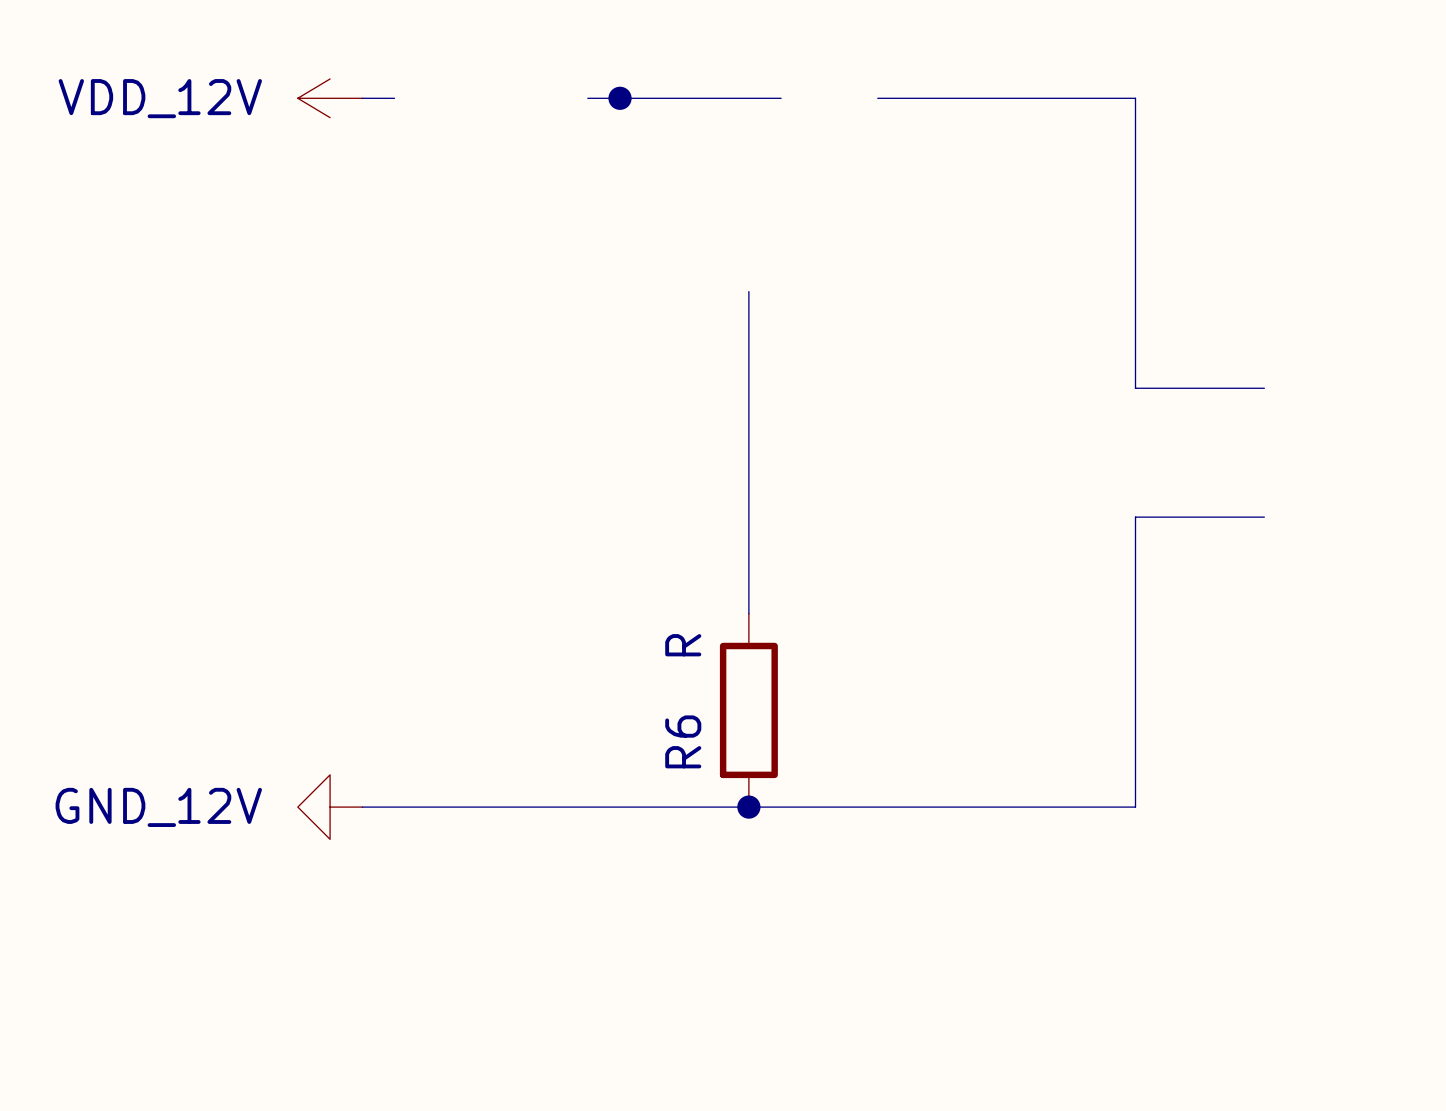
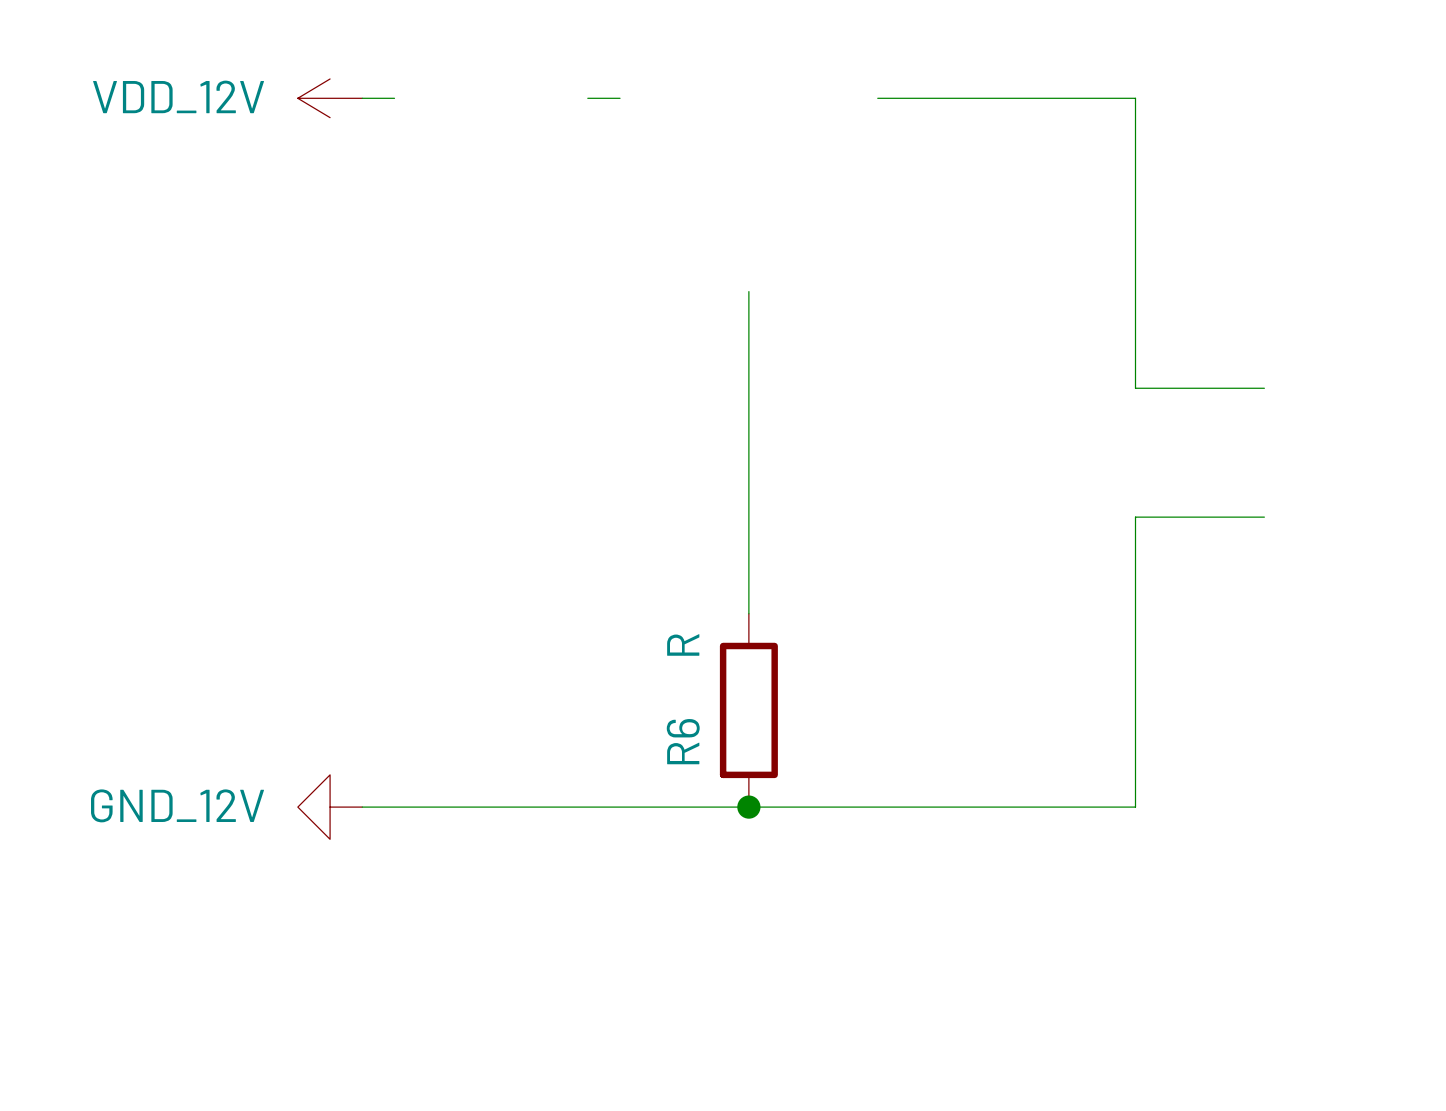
wire: (620, 98) (781, 98) -> none
junction: (620, 98) -> none

